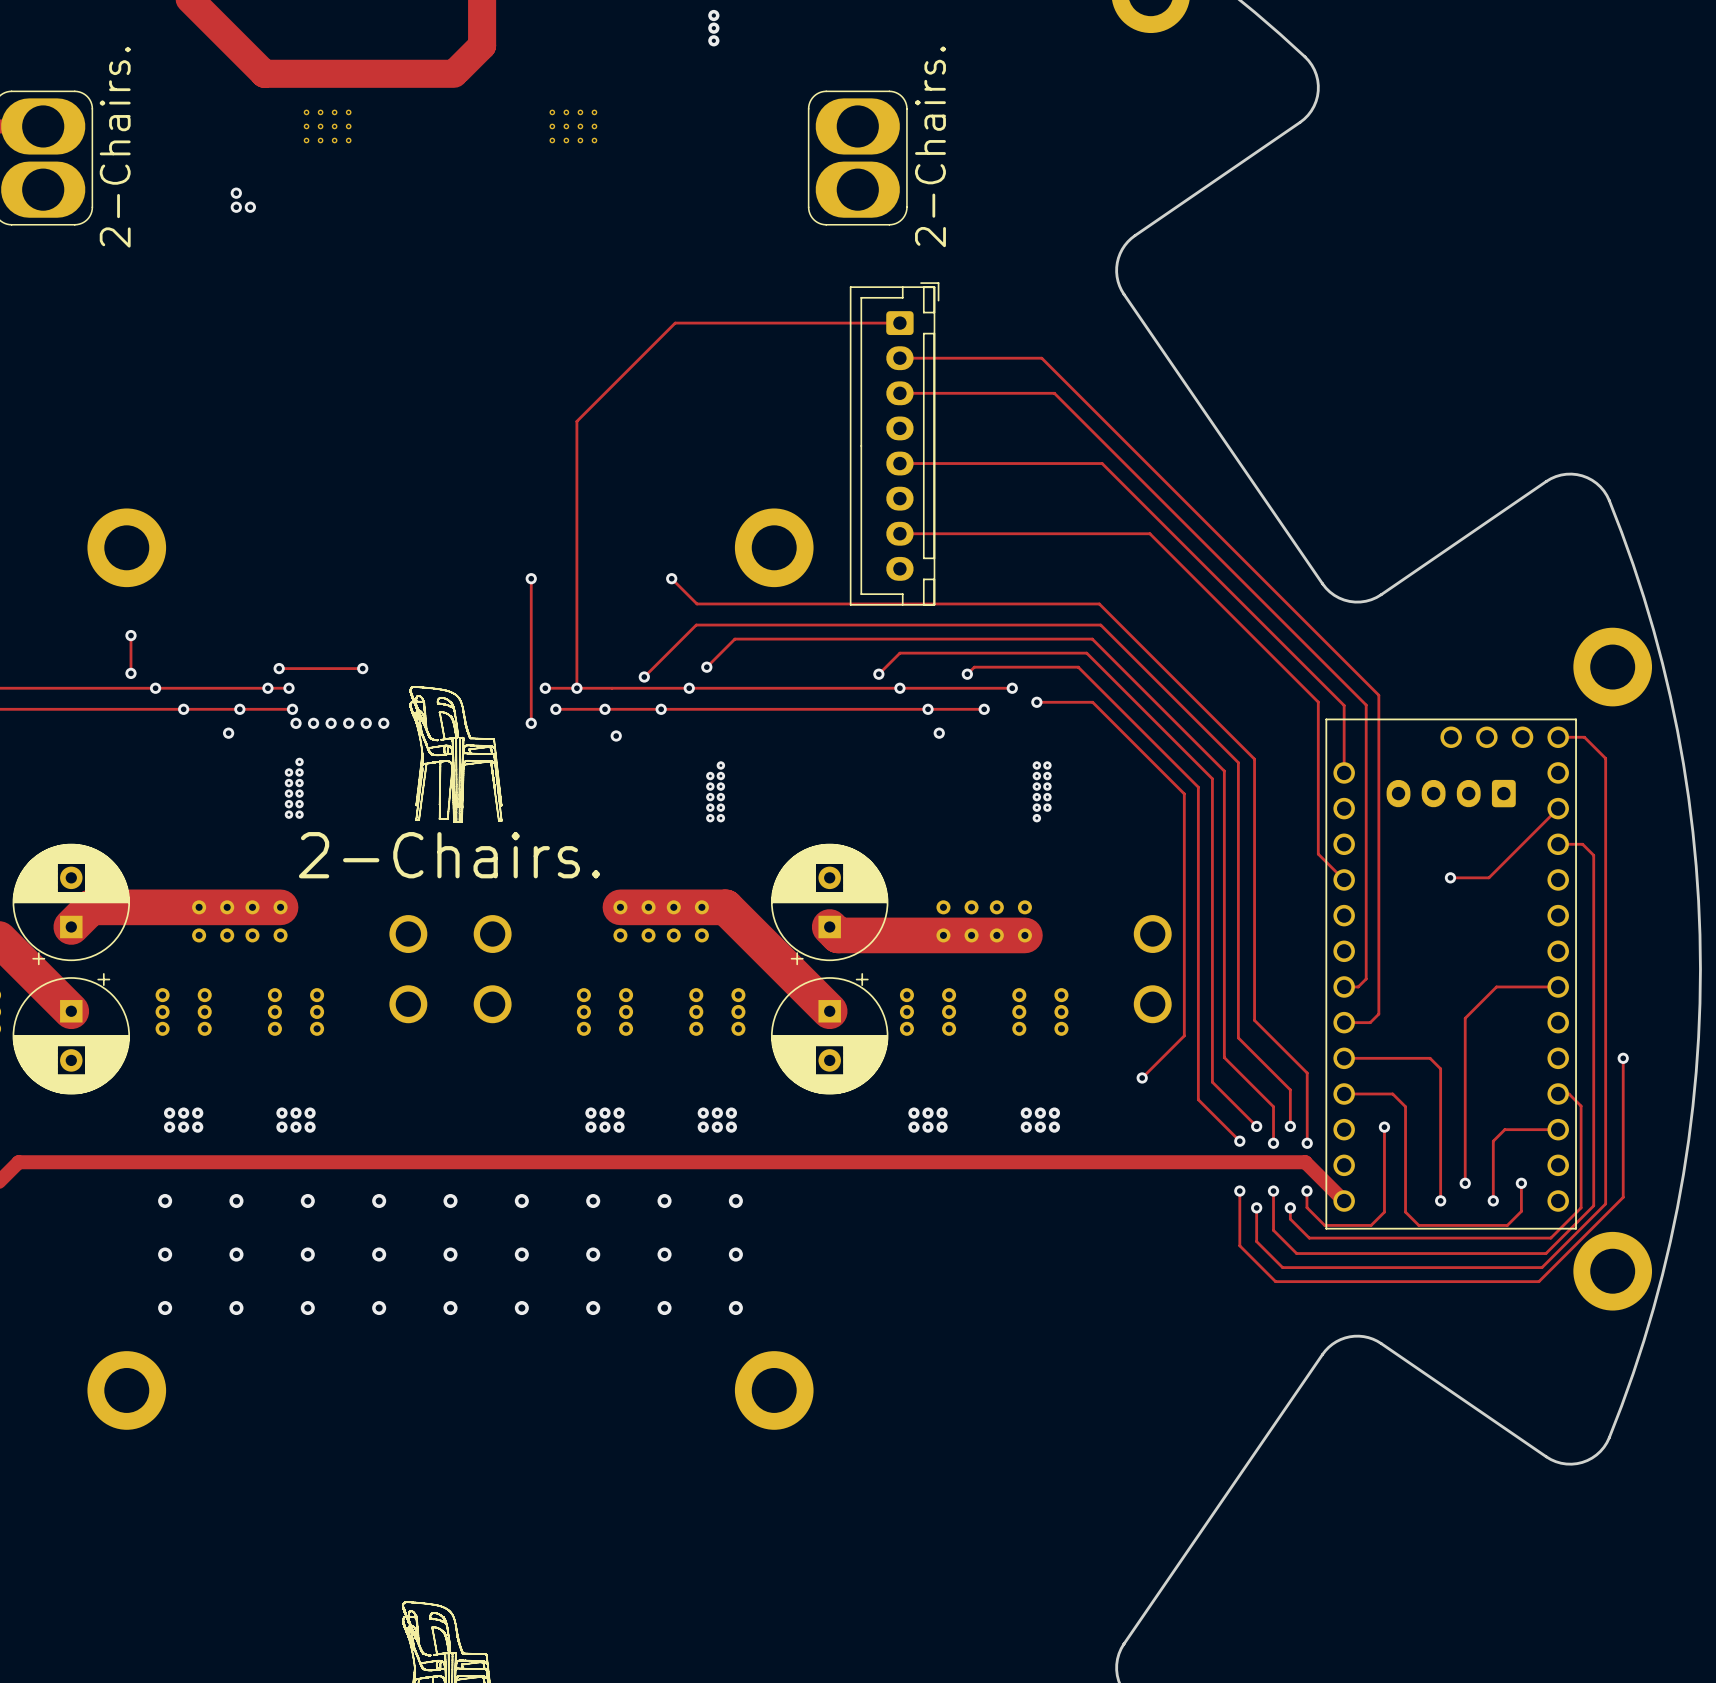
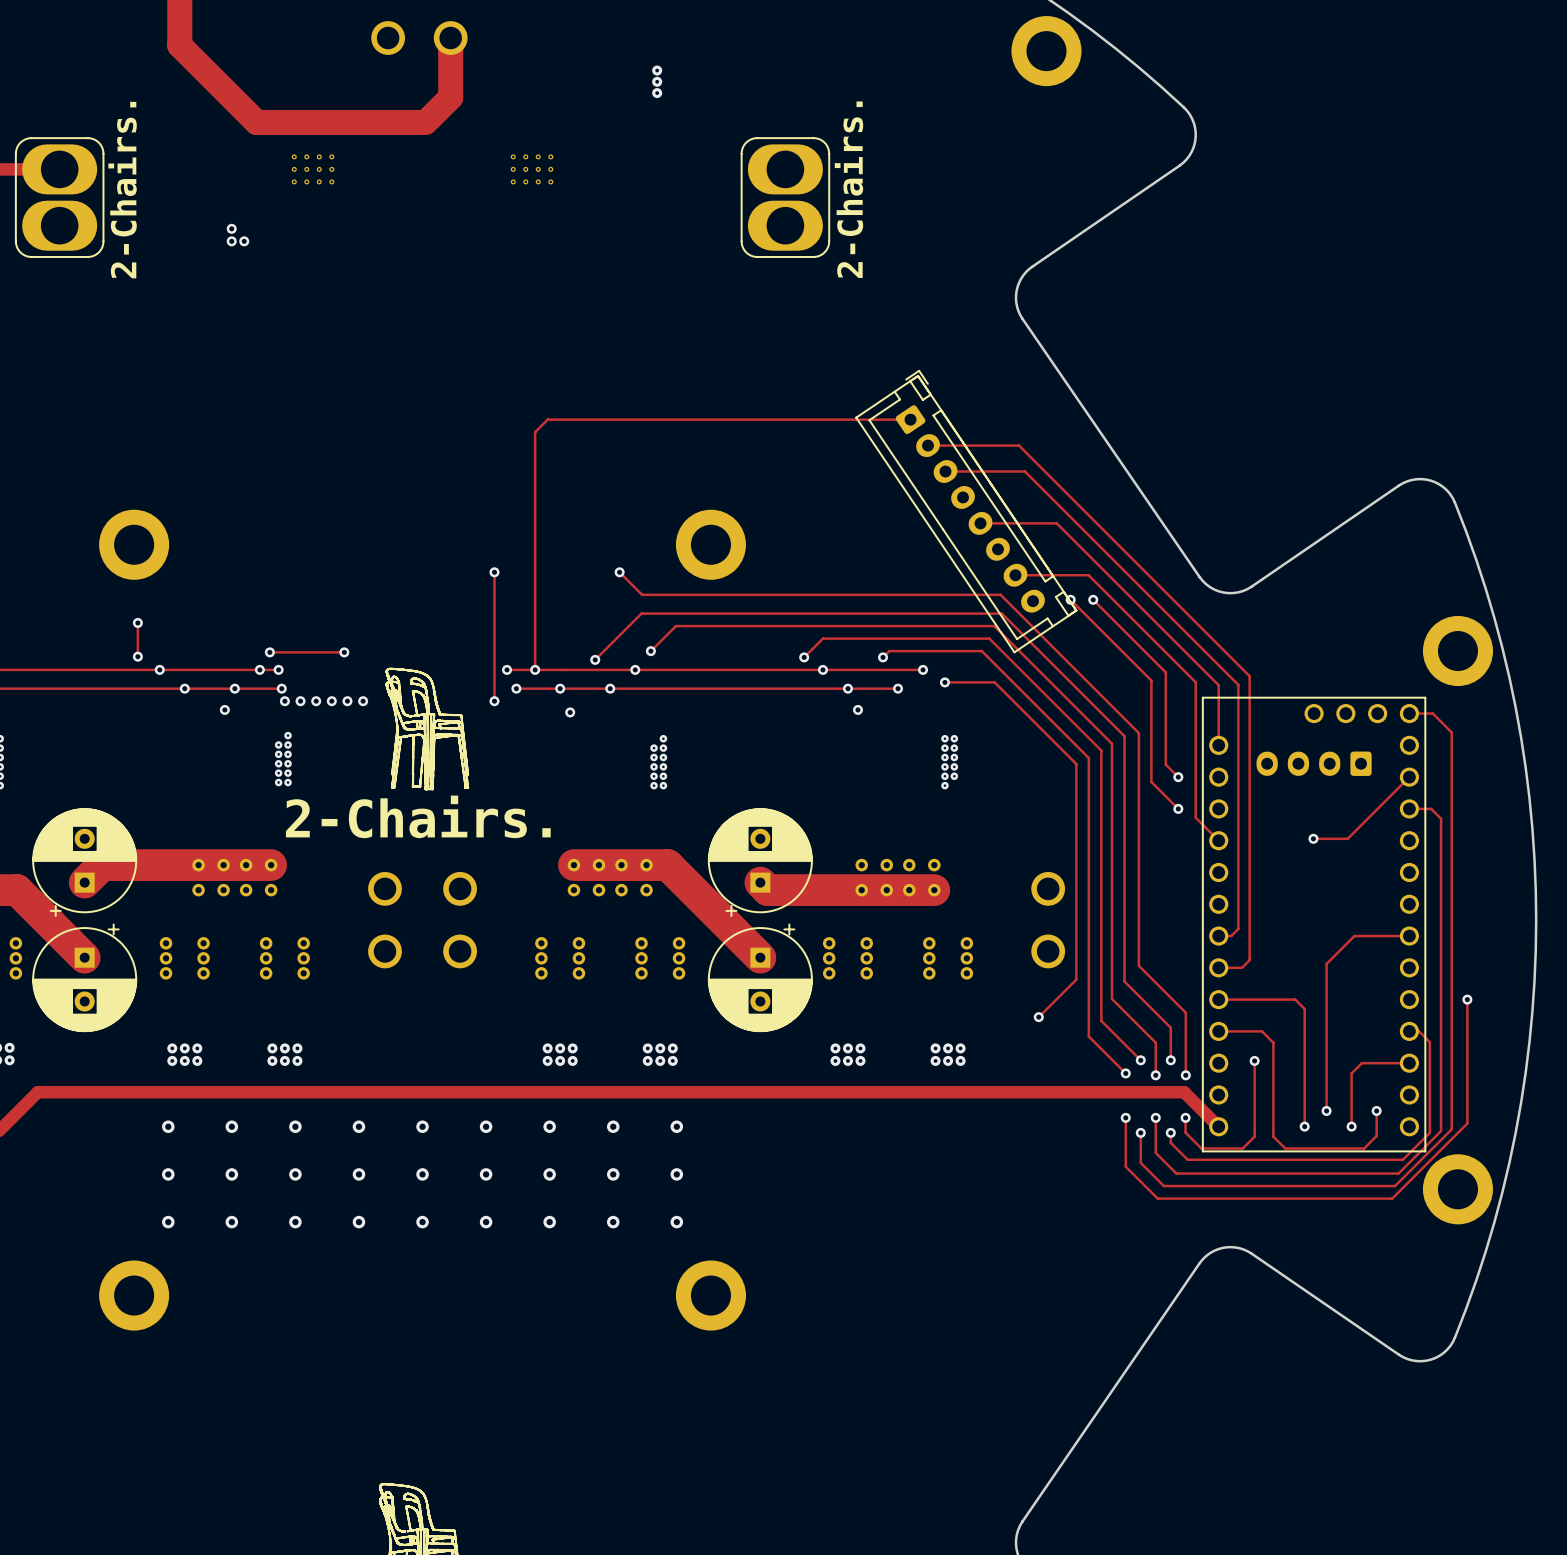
track: (899, 323) (675, 323) (590, 407) -> (898, 419) (547, 419)
track: (899, 358) (1041, 358) (1120, 436) -> (928, 445) (1019, 445)
track: (899, 393) (1054, 393) (1126, 465) -> (945, 471) (1024, 471)
part: (894, 443) -> none
track: (899, 463) (1102, 463) (1162, 523) -> (980, 523) (1056, 523)
part: none -> (966, 511)
track: (899, 533) (1149, 533) (1198, 582) -> (1015, 575) (1088, 575)
track: none -> (1070, 599) (1151, 680) (1151, 782) (1178, 808)
via: none -> (1070, 599)
track: none -> (1093, 599) (1165, 672) (1165, 764) (1178, 777)
via: none -> (1093, 599)
via: none -> (1178, 777)
via: none -> (1178, 808)

